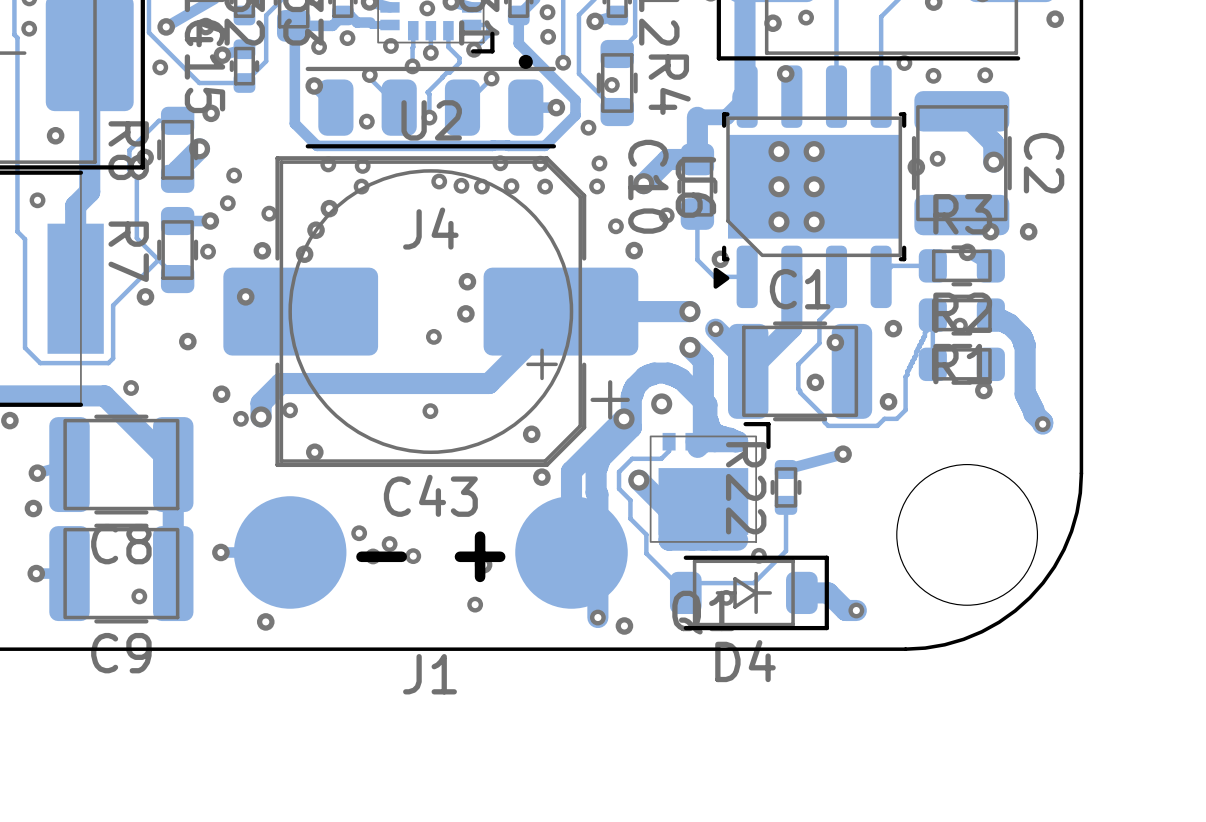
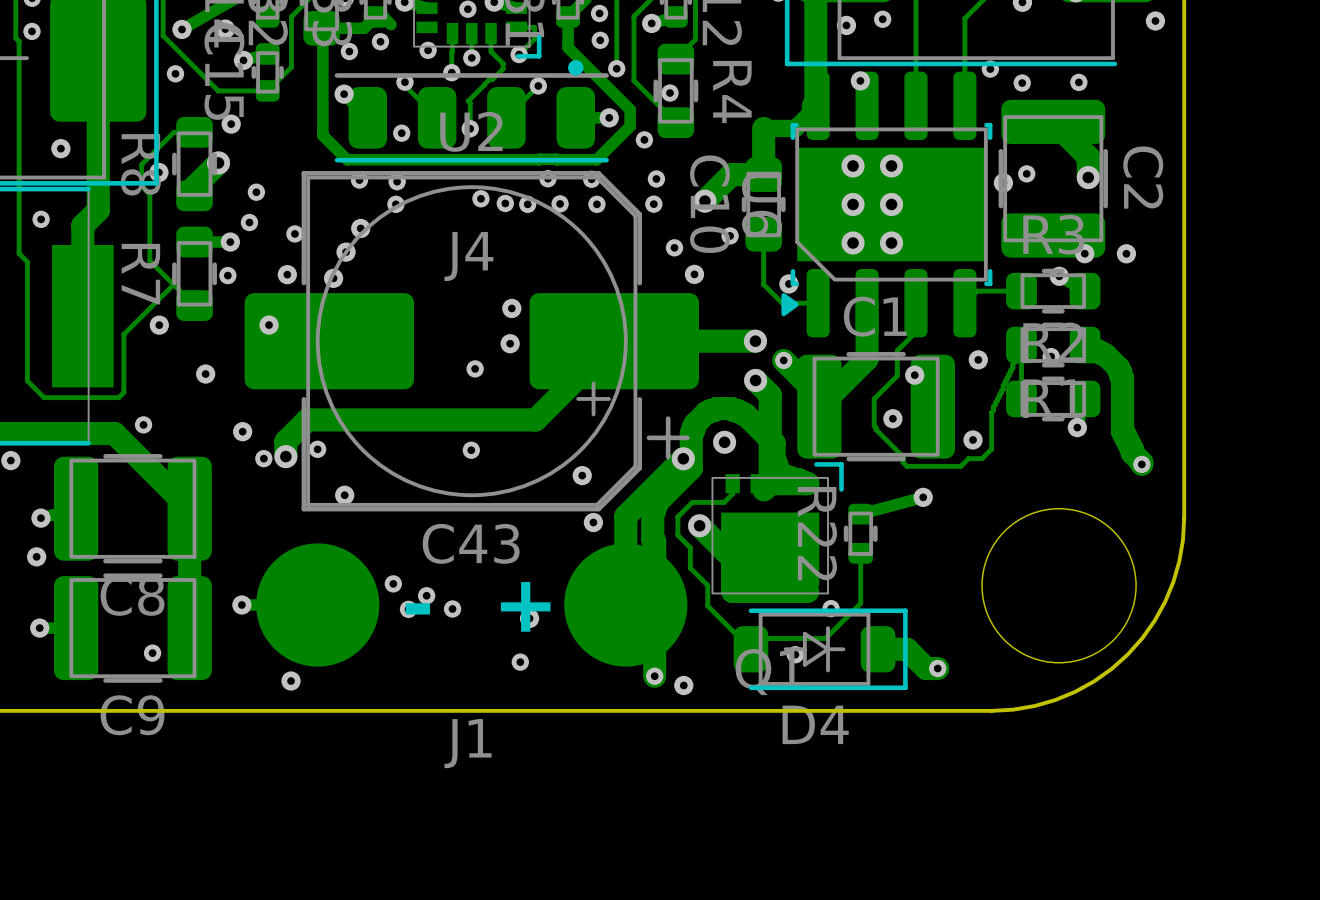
track: (357, 22) (389, 24) -> none

